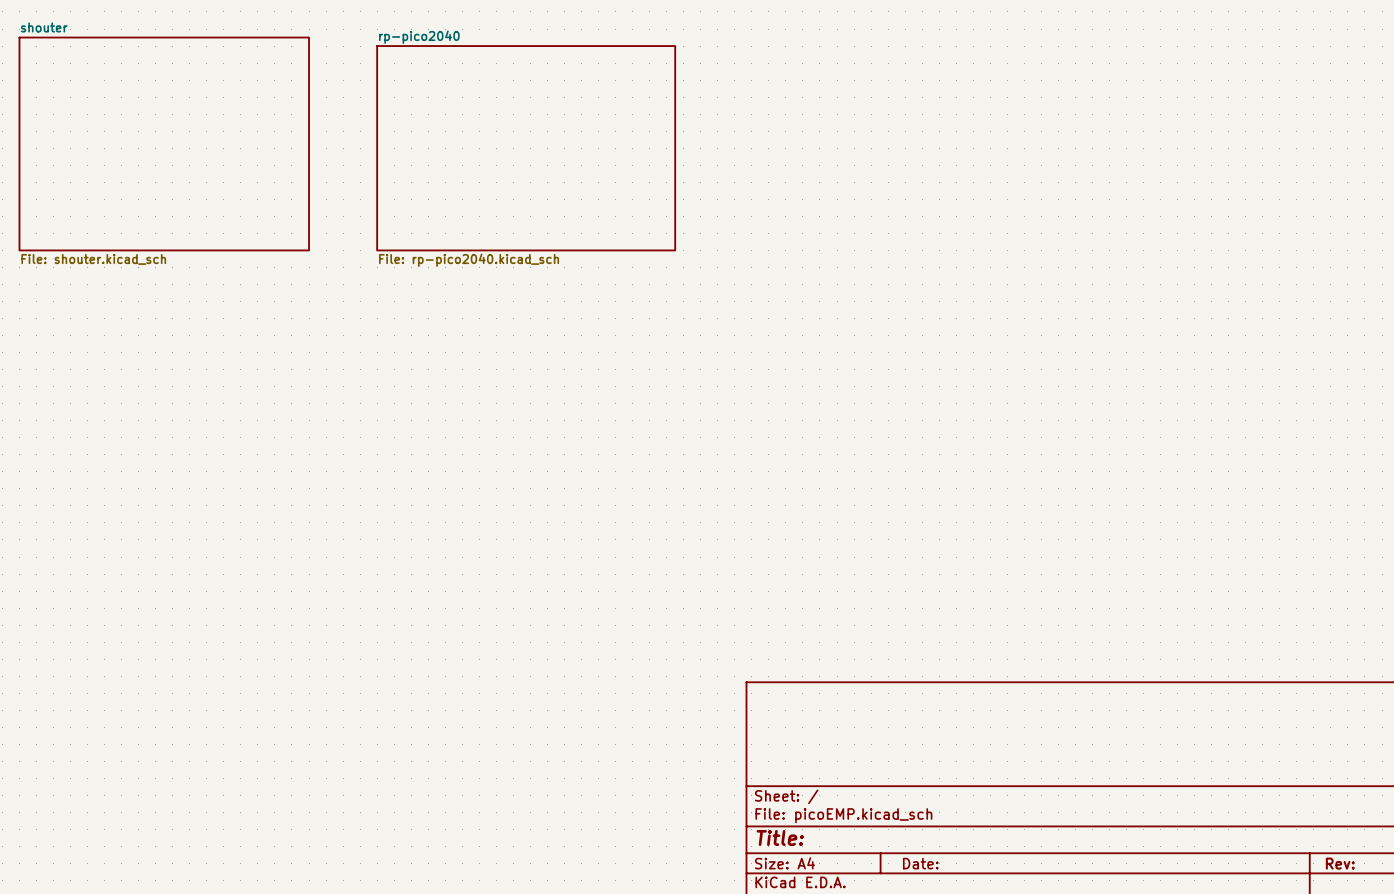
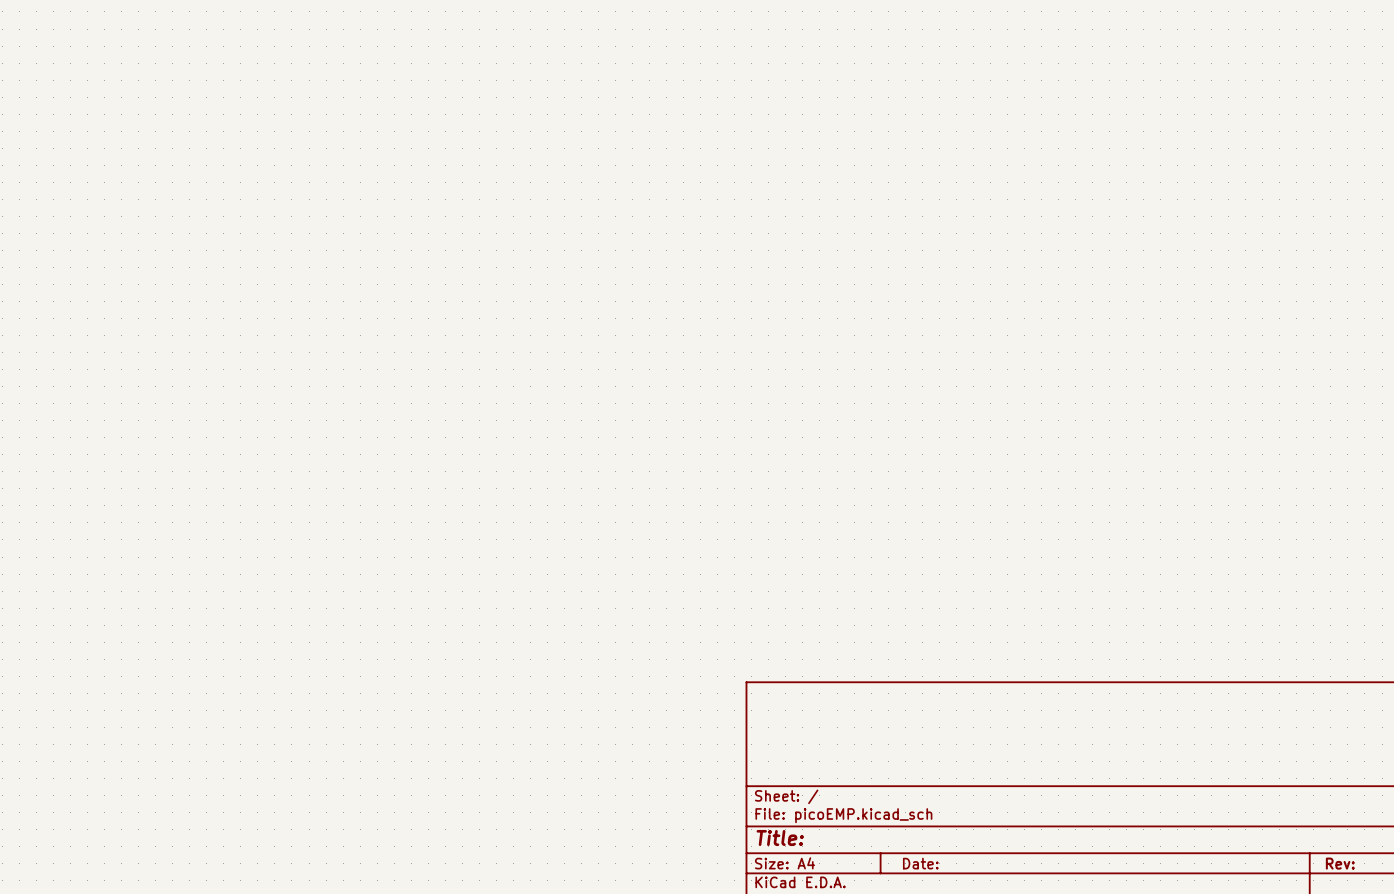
sheet shouter: File: shouter.kicad_sch (164, 143) -> none
sheet rp-pico2040: File: rp-pico2040.kicad_sch (526, 148) -> none

